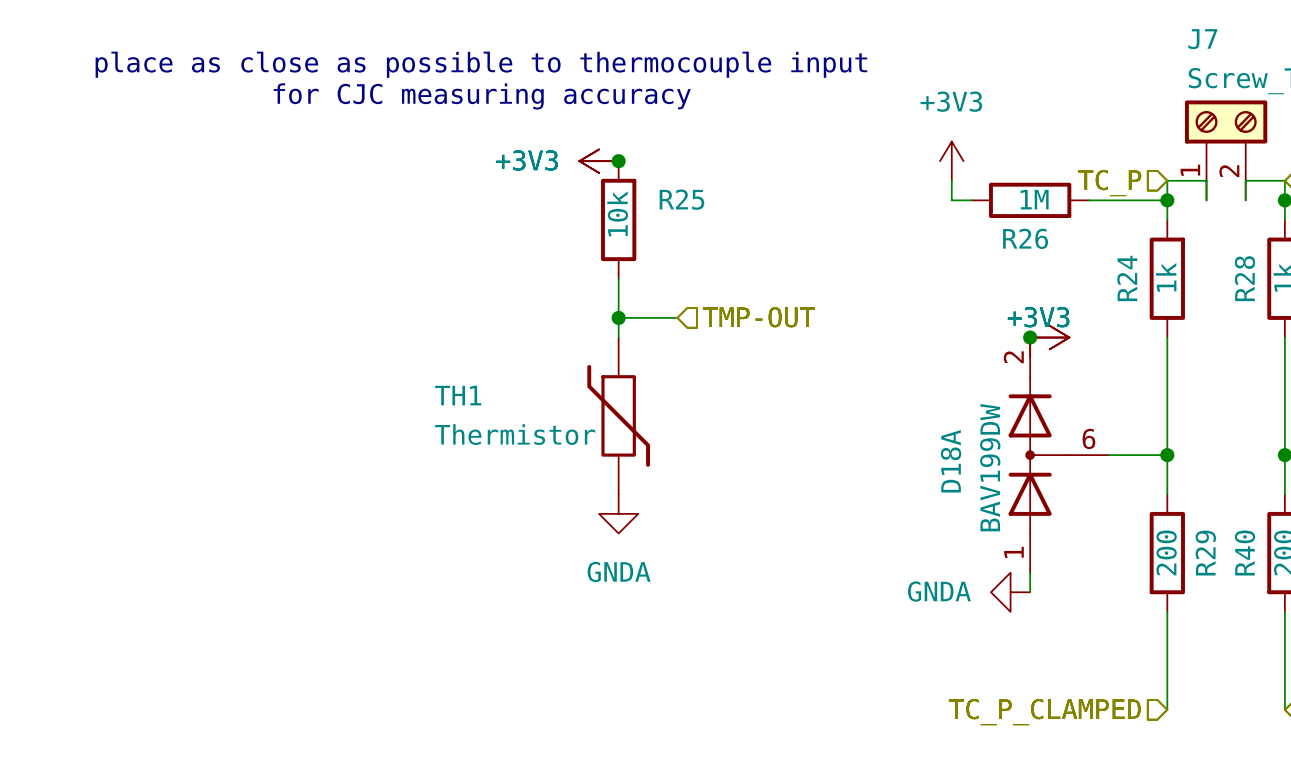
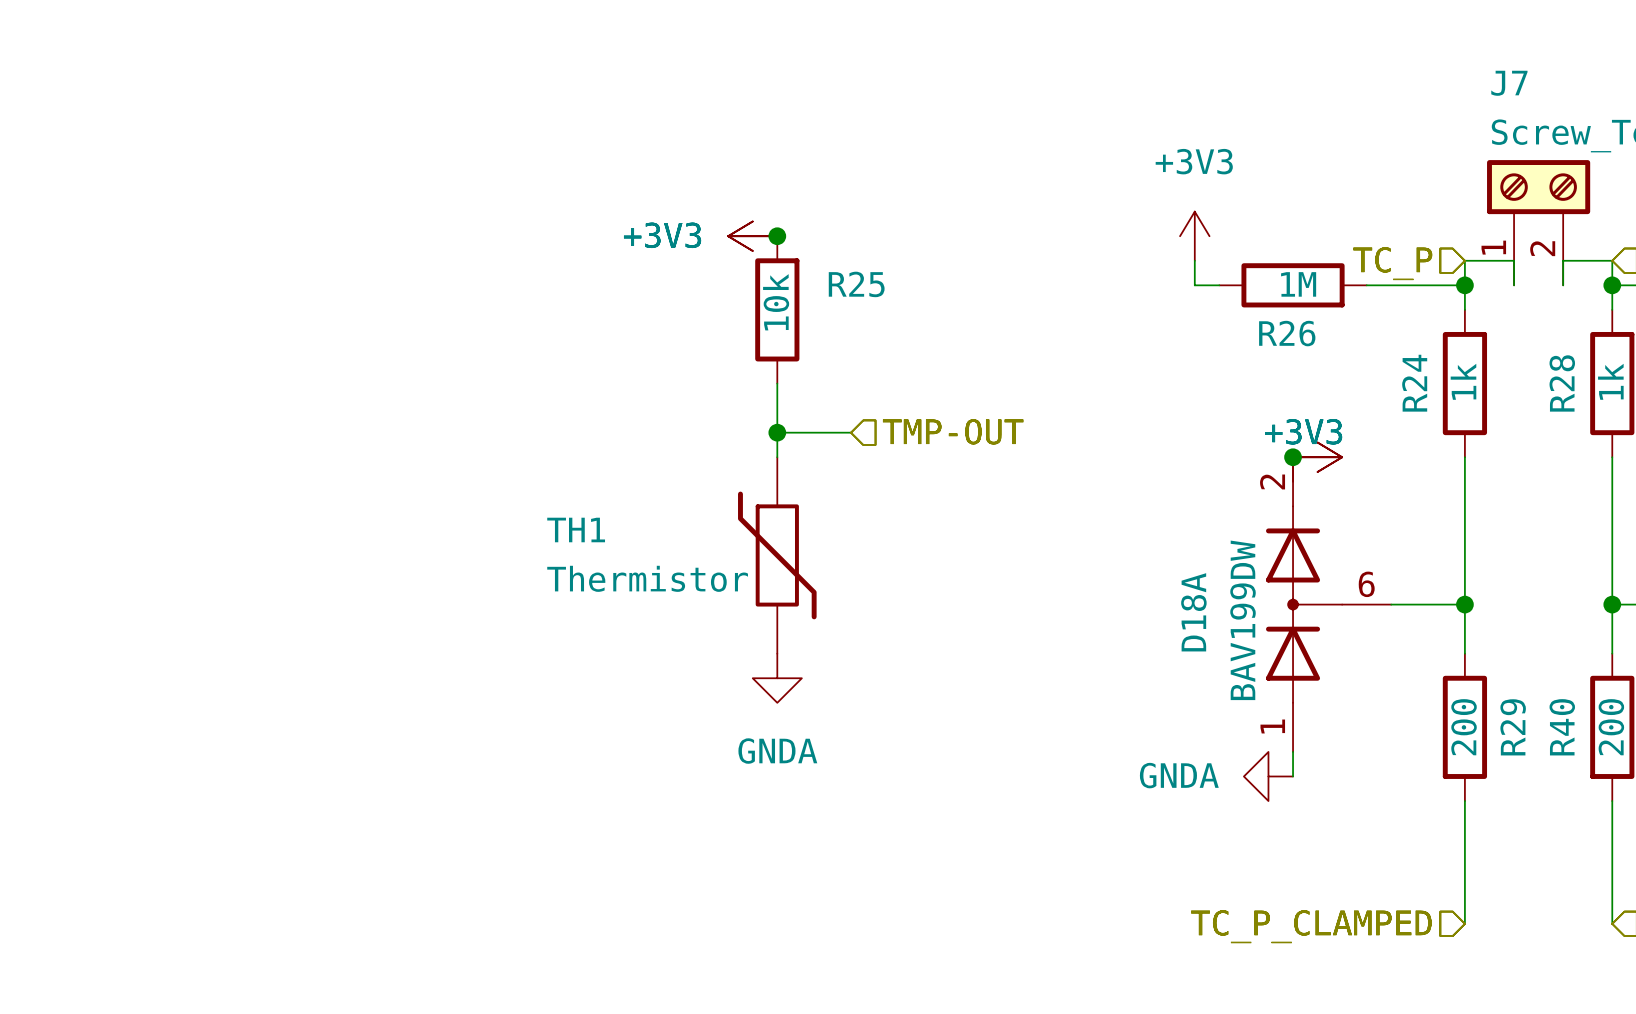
text: place as close as possible to thermocouple input (481, 64) -> none
text: for CJC measuring accuracy (482, 96) -> none

